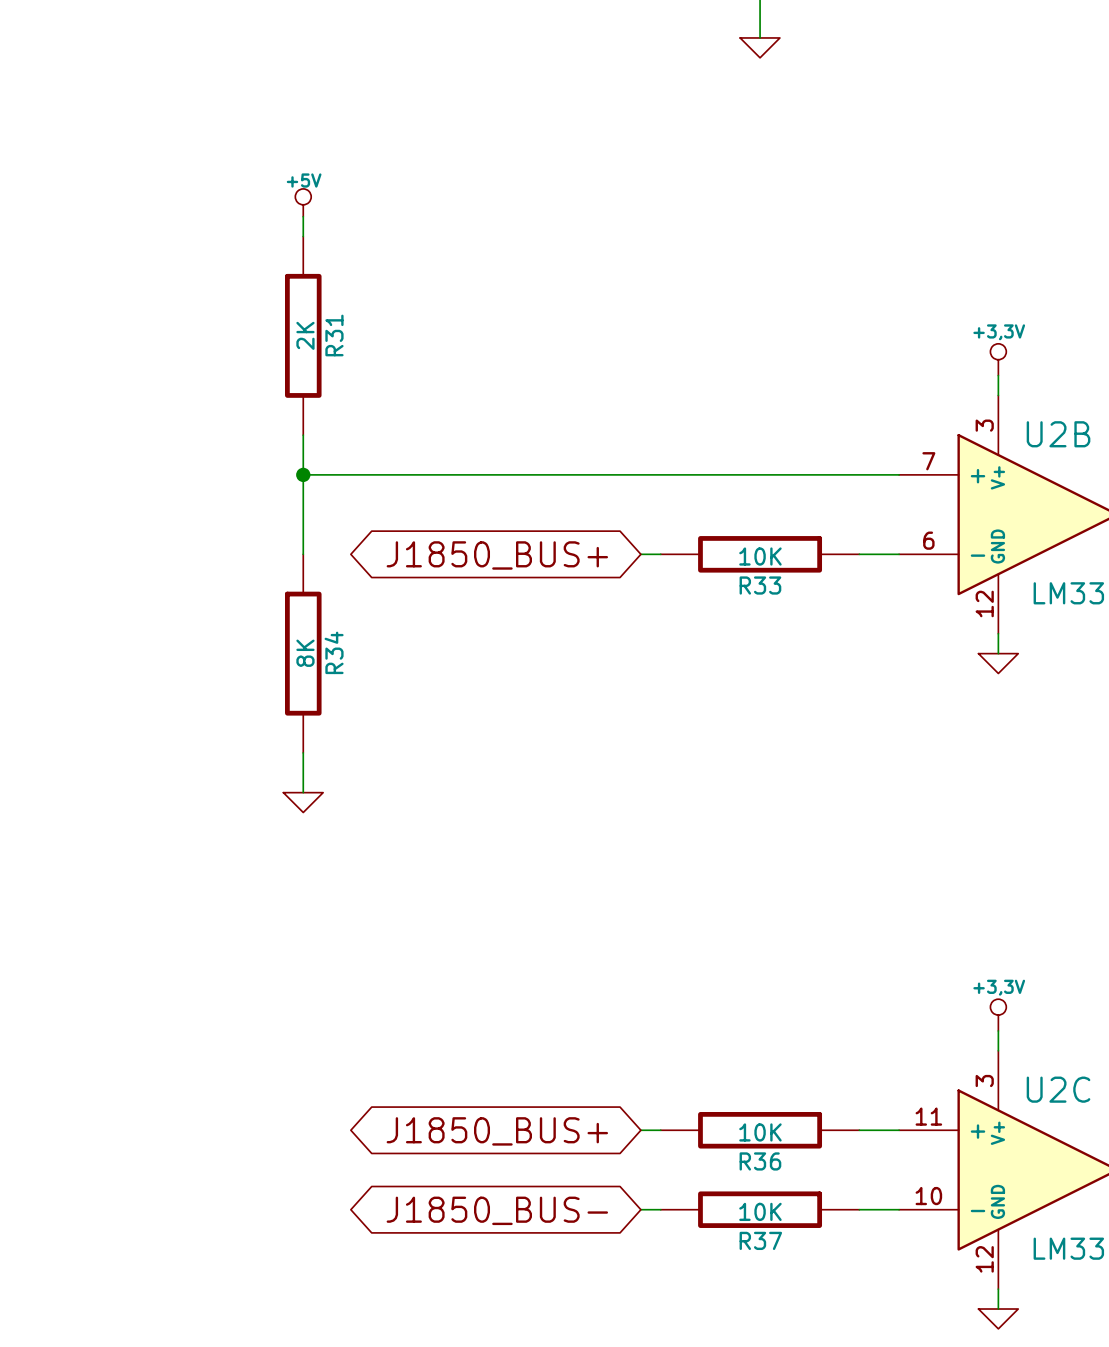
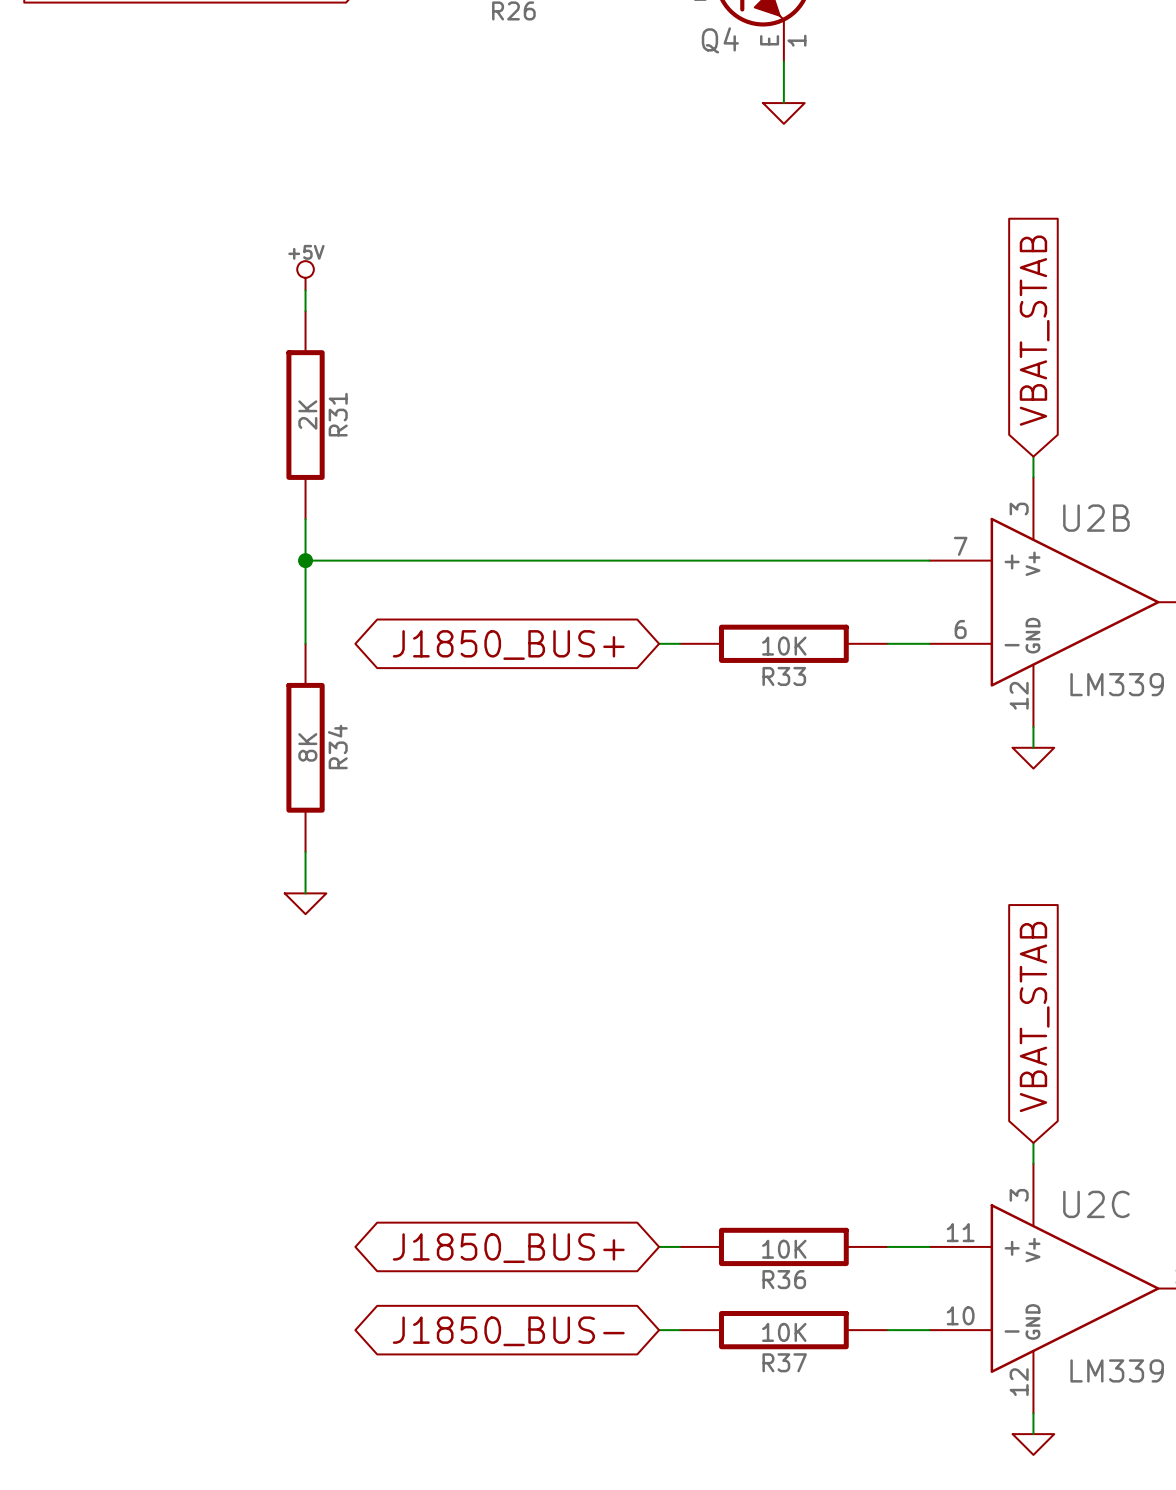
global label: none -> VBAT_STAB (1034, 330)
power symbol: +3,3V (998, 359) -> none
global label: none -> VBAT_STAB (1034, 1016)
power symbol: +3,3V (998, 1015) -> none

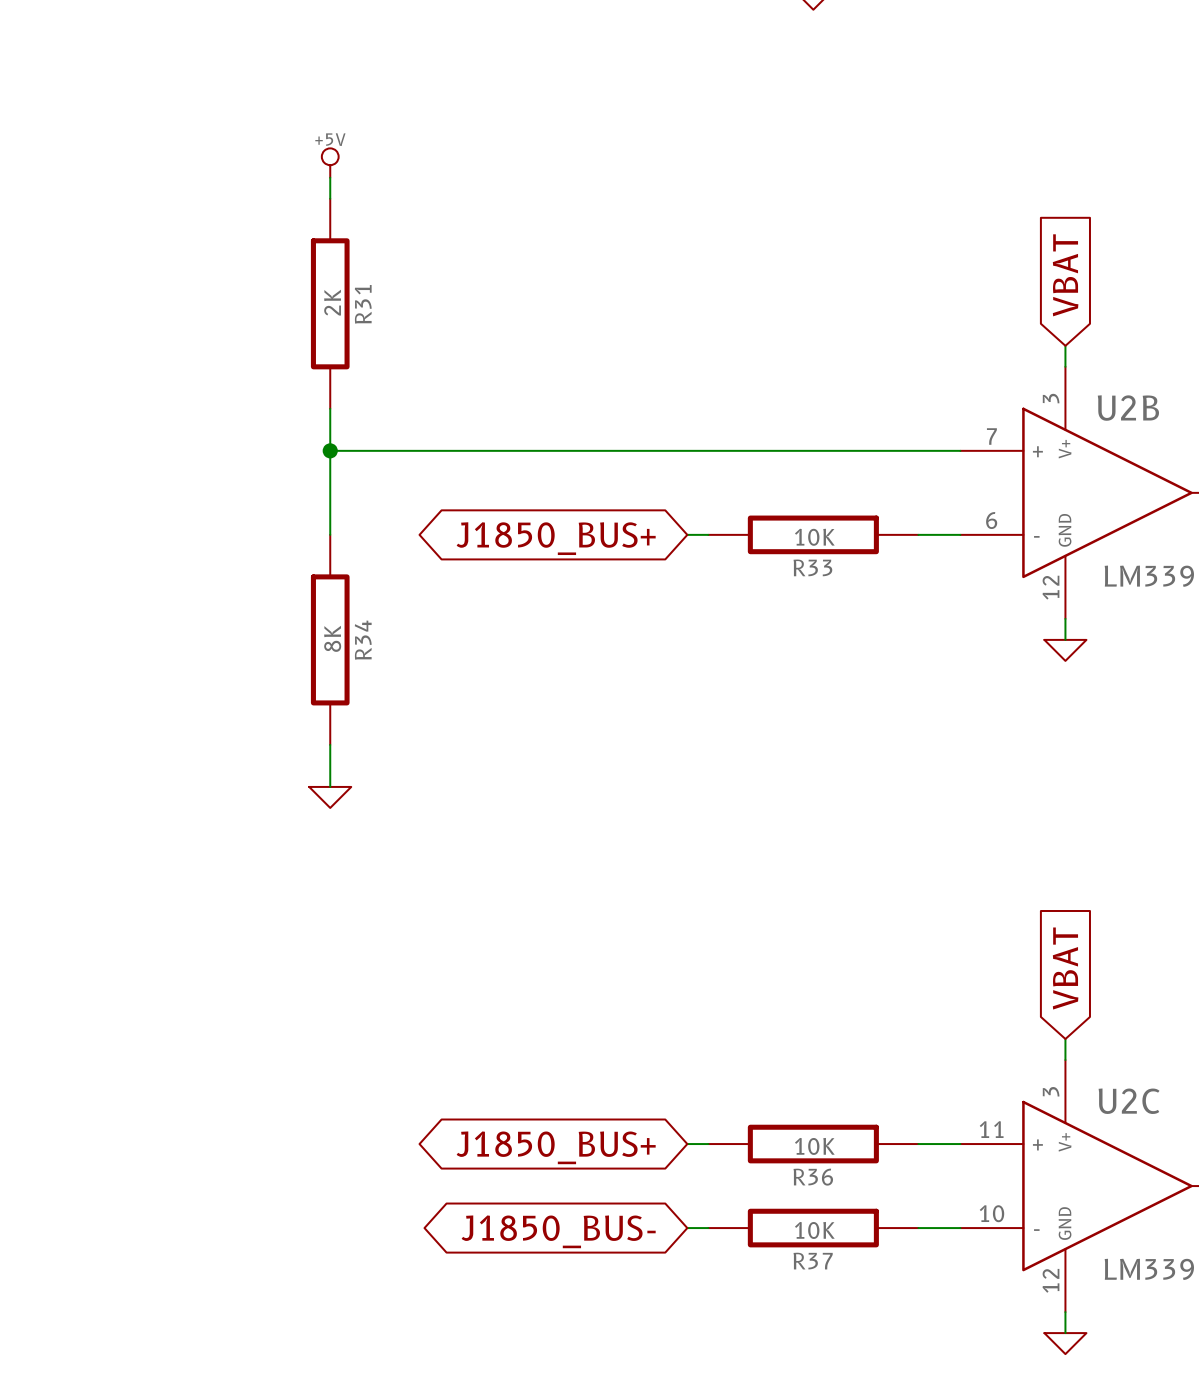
global label: VBAT_STAB (1034, 330) -> VBAT (1065, 275)
global label: VBAT_STAB (1034, 1016) -> VBAT (1065, 968)

